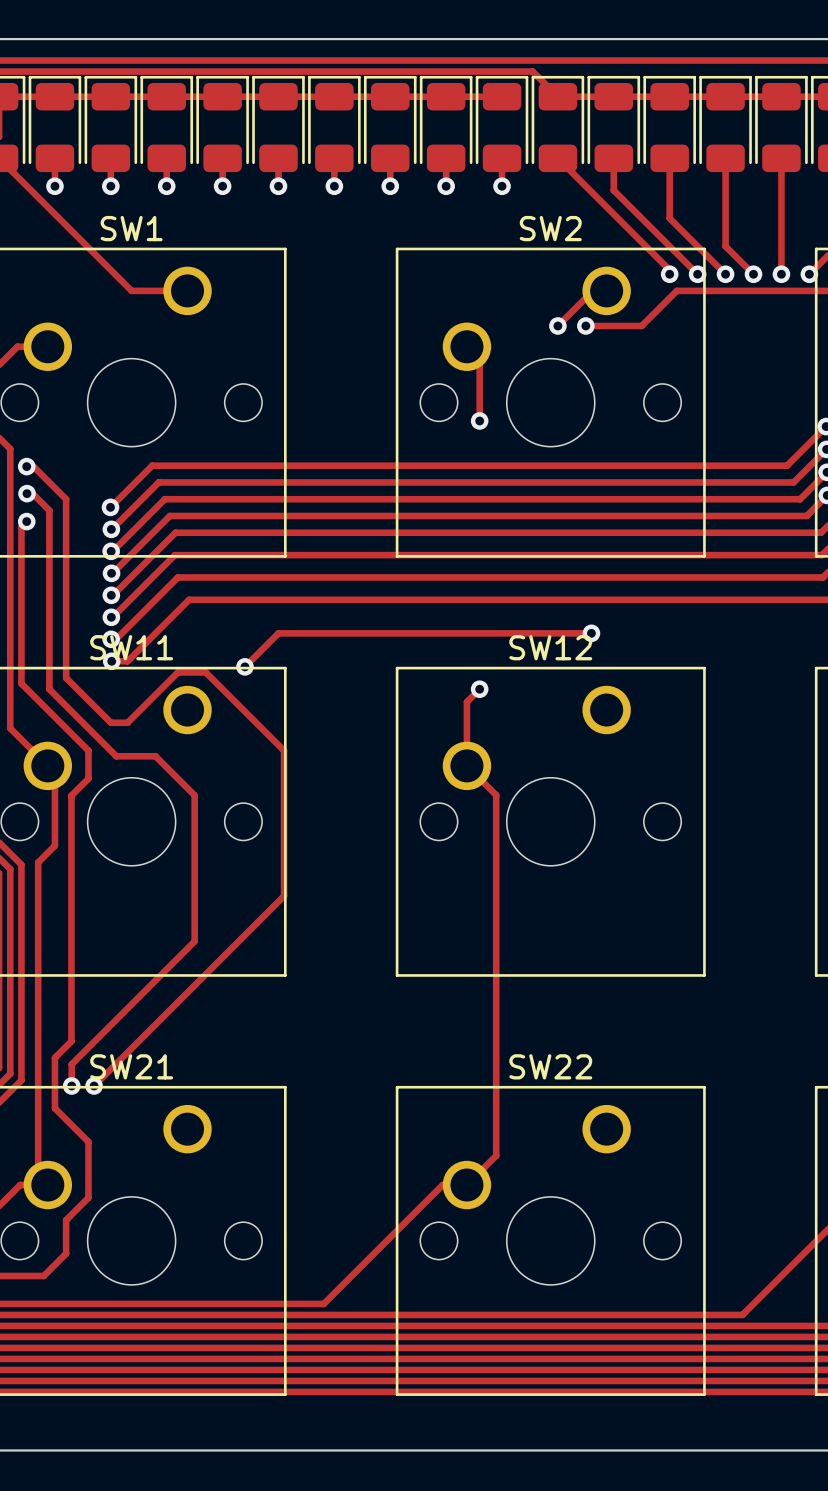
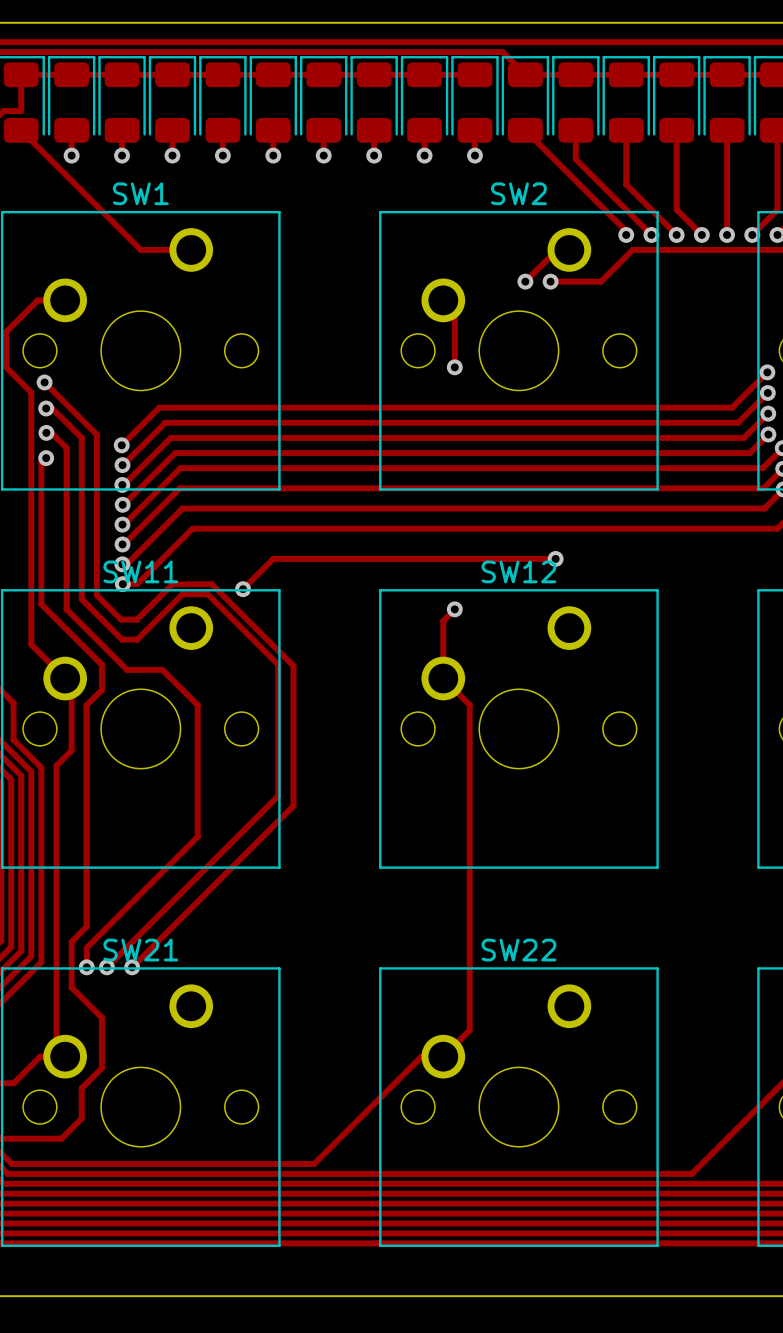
track: none -> (44, 382) (96, 434) (96, 595) (121, 619) (137, 619) (172, 584) (211, 584) (293, 665) (293, 805) (132, 967)
via: none -> (44, 382)
via: none -> (132, 967)

